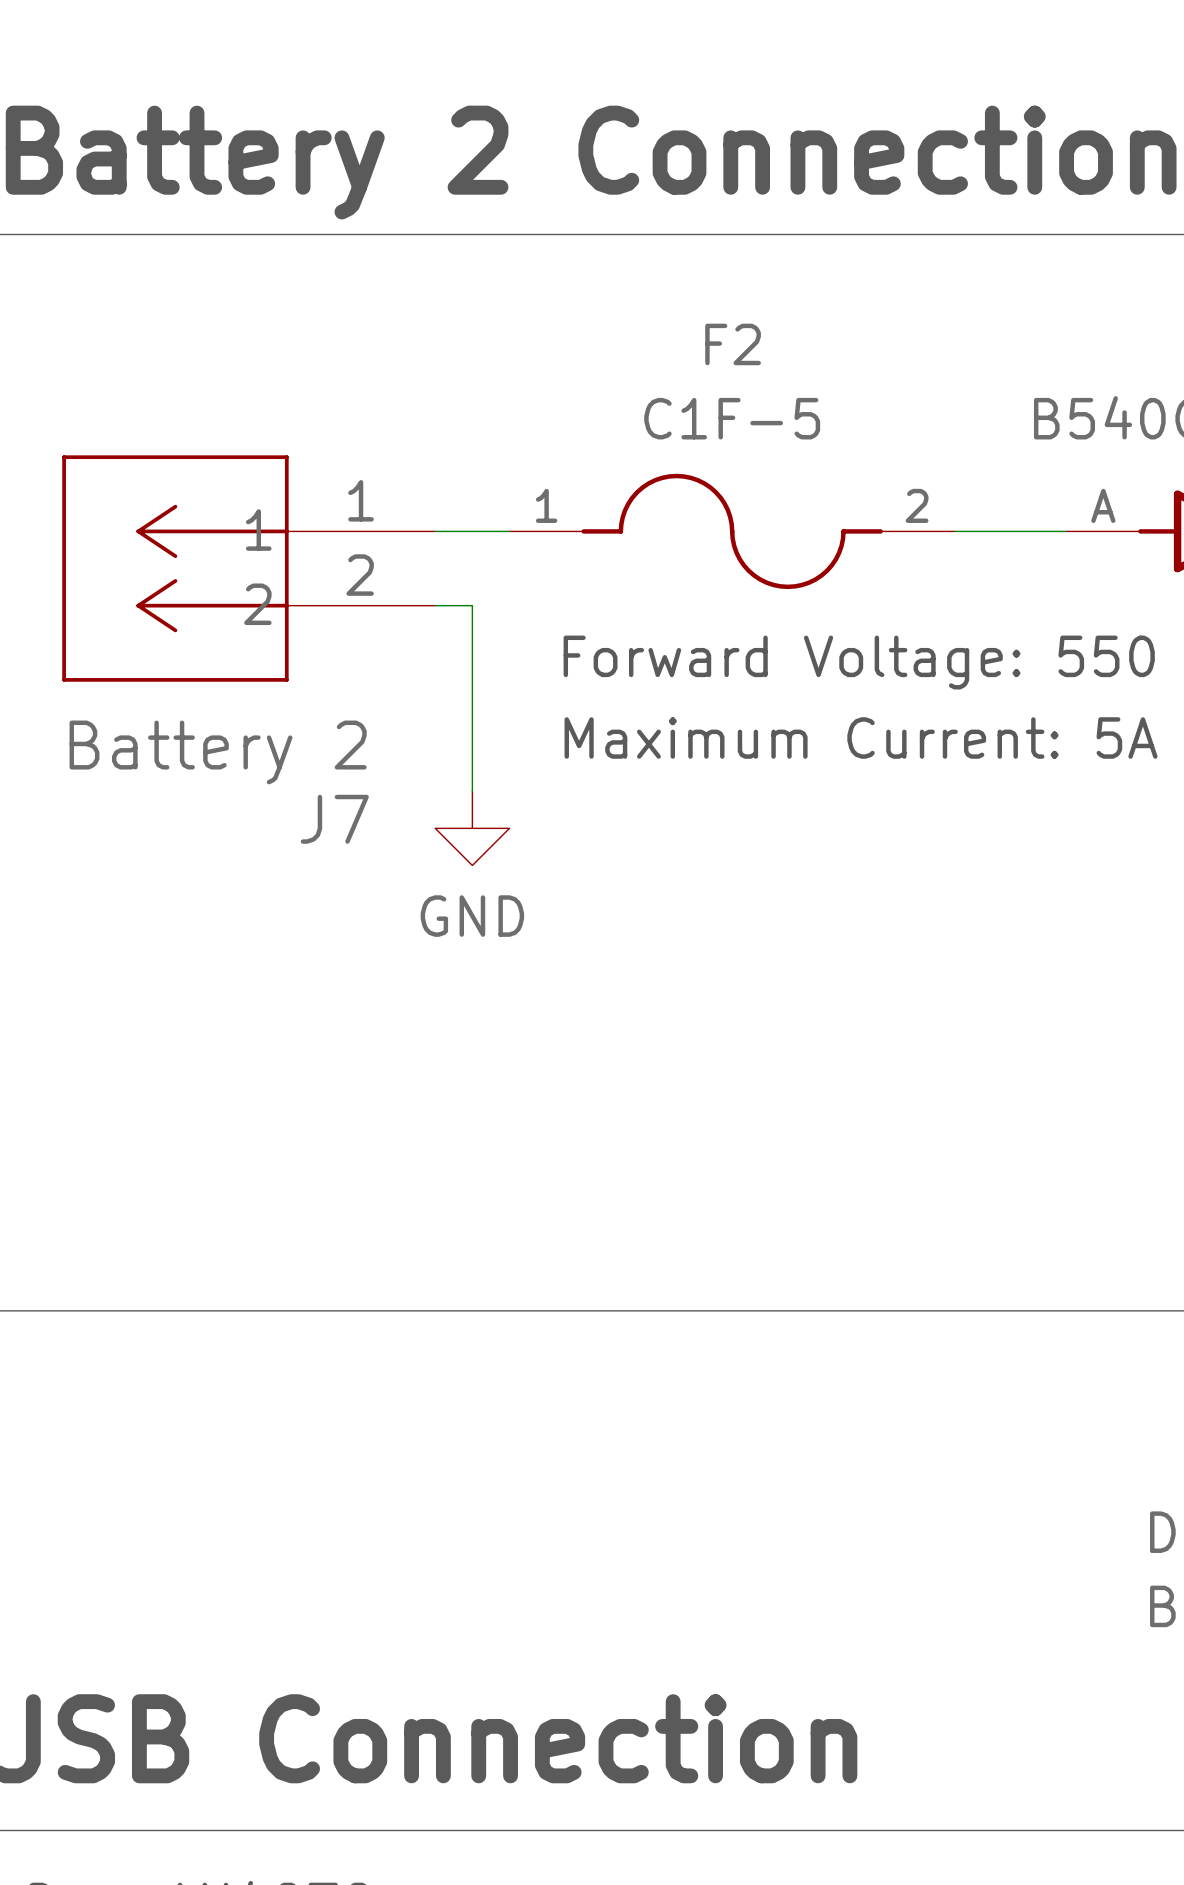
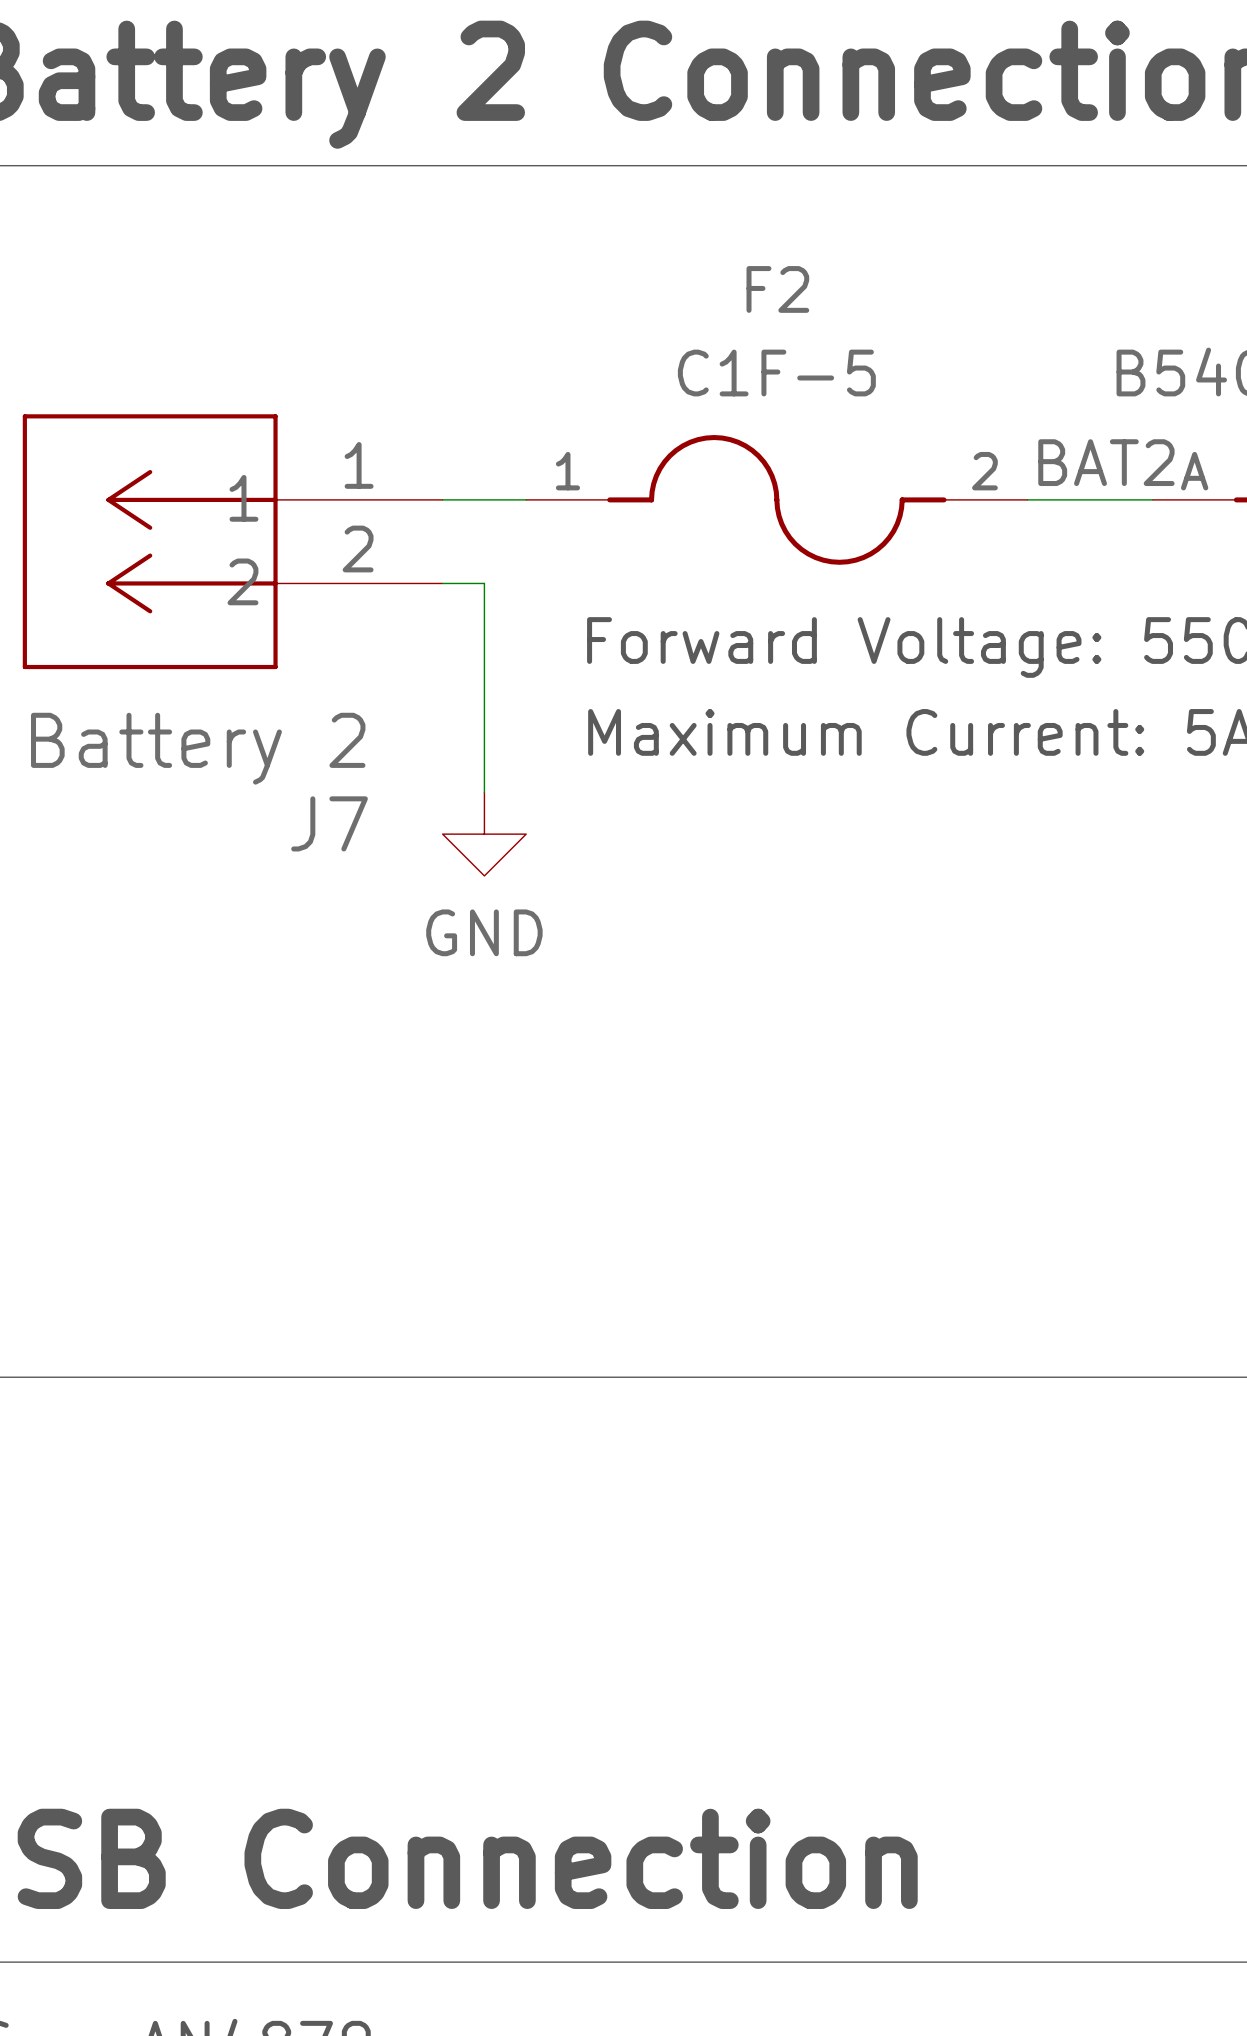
label: none -> BAT2 (1106, 462)

